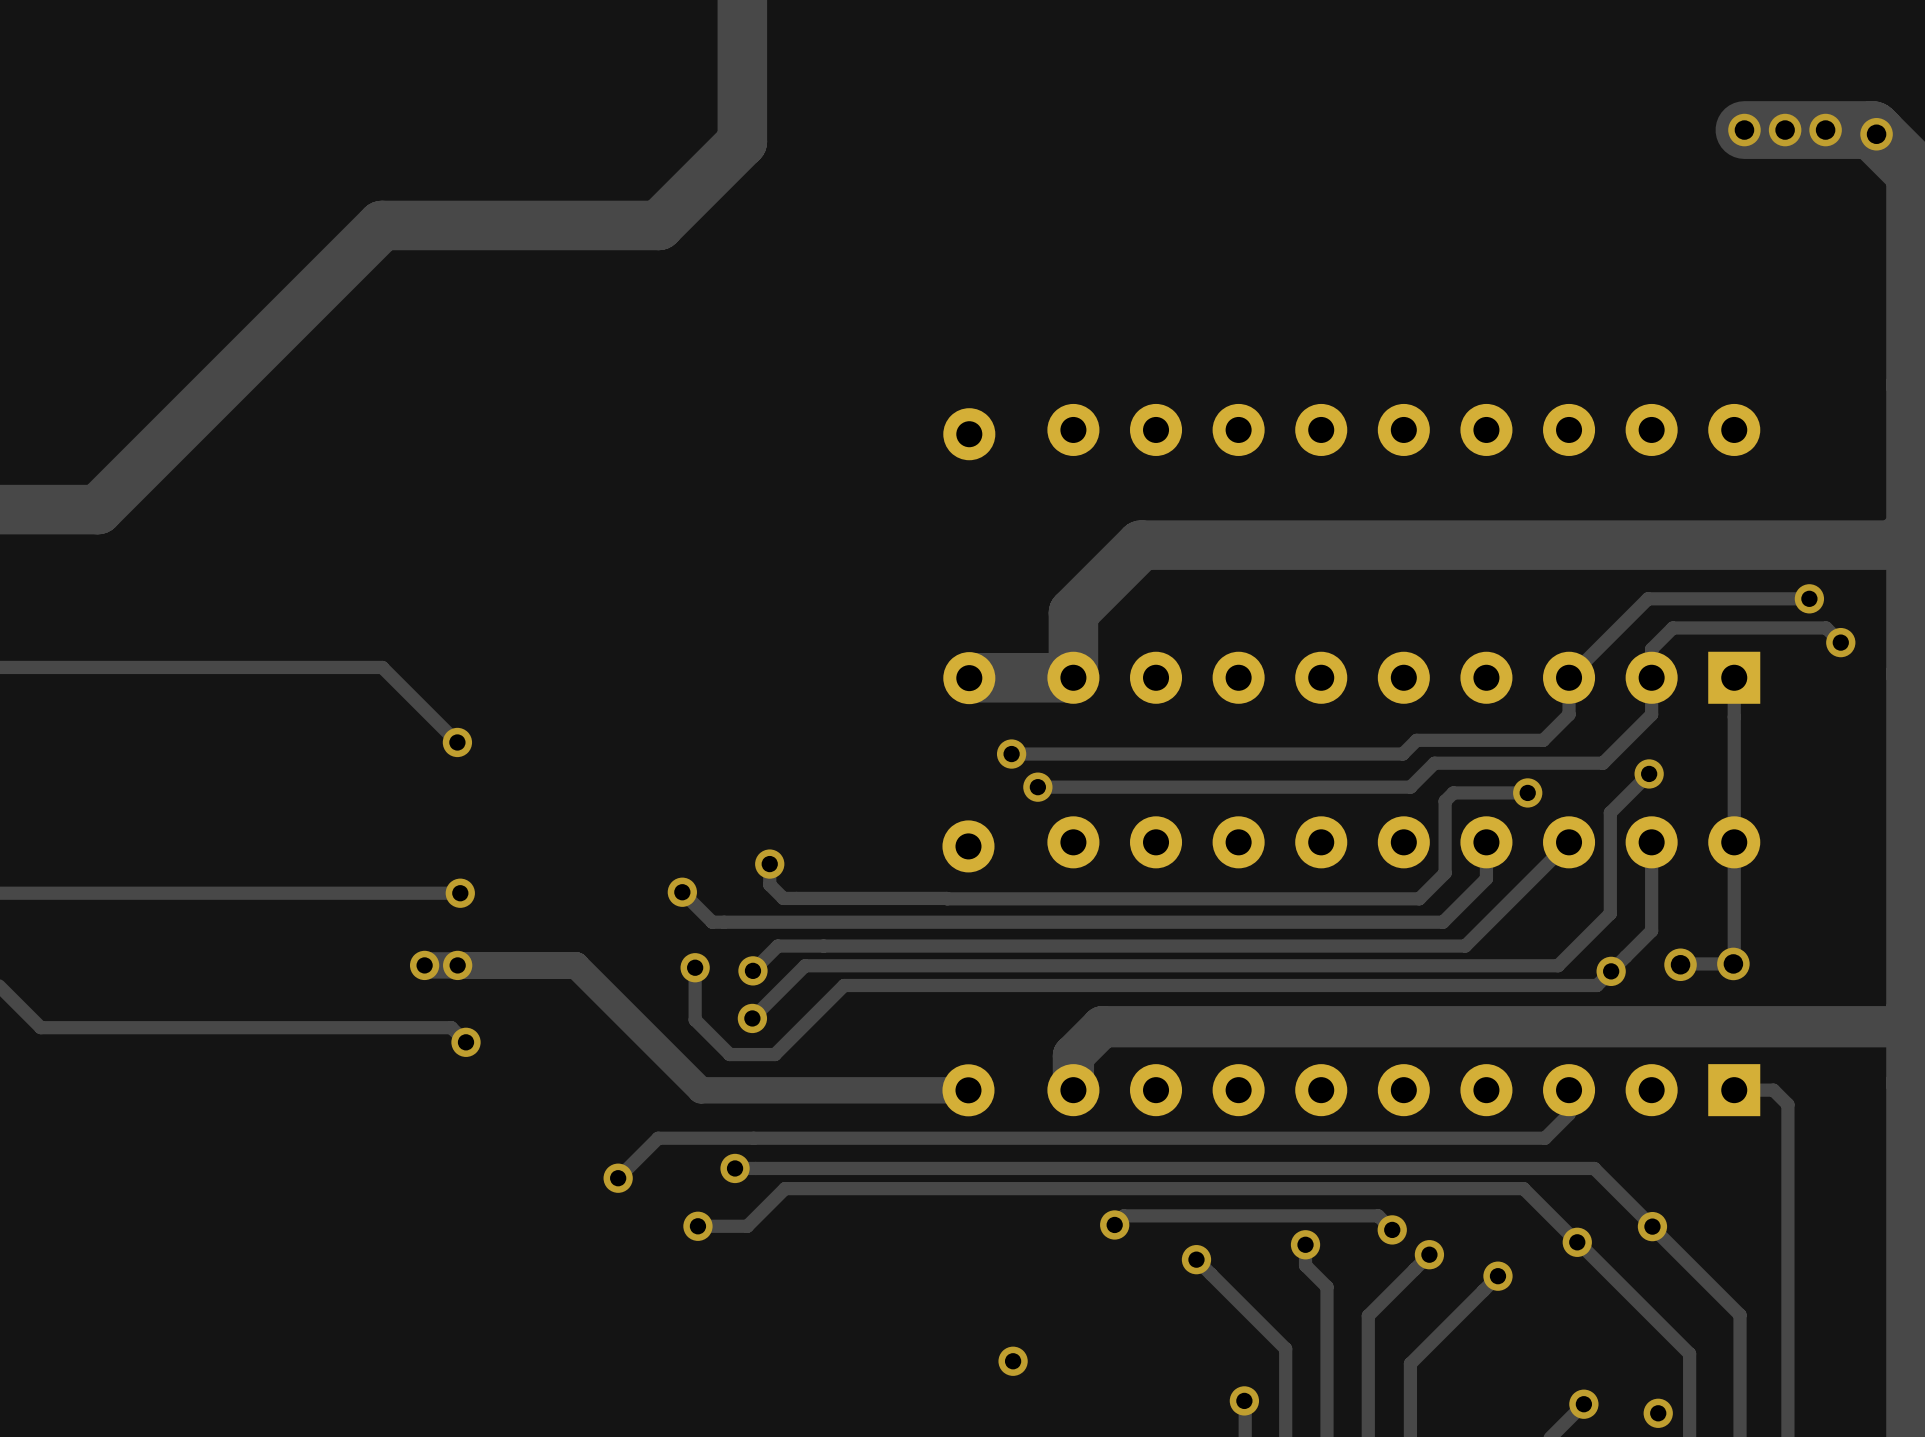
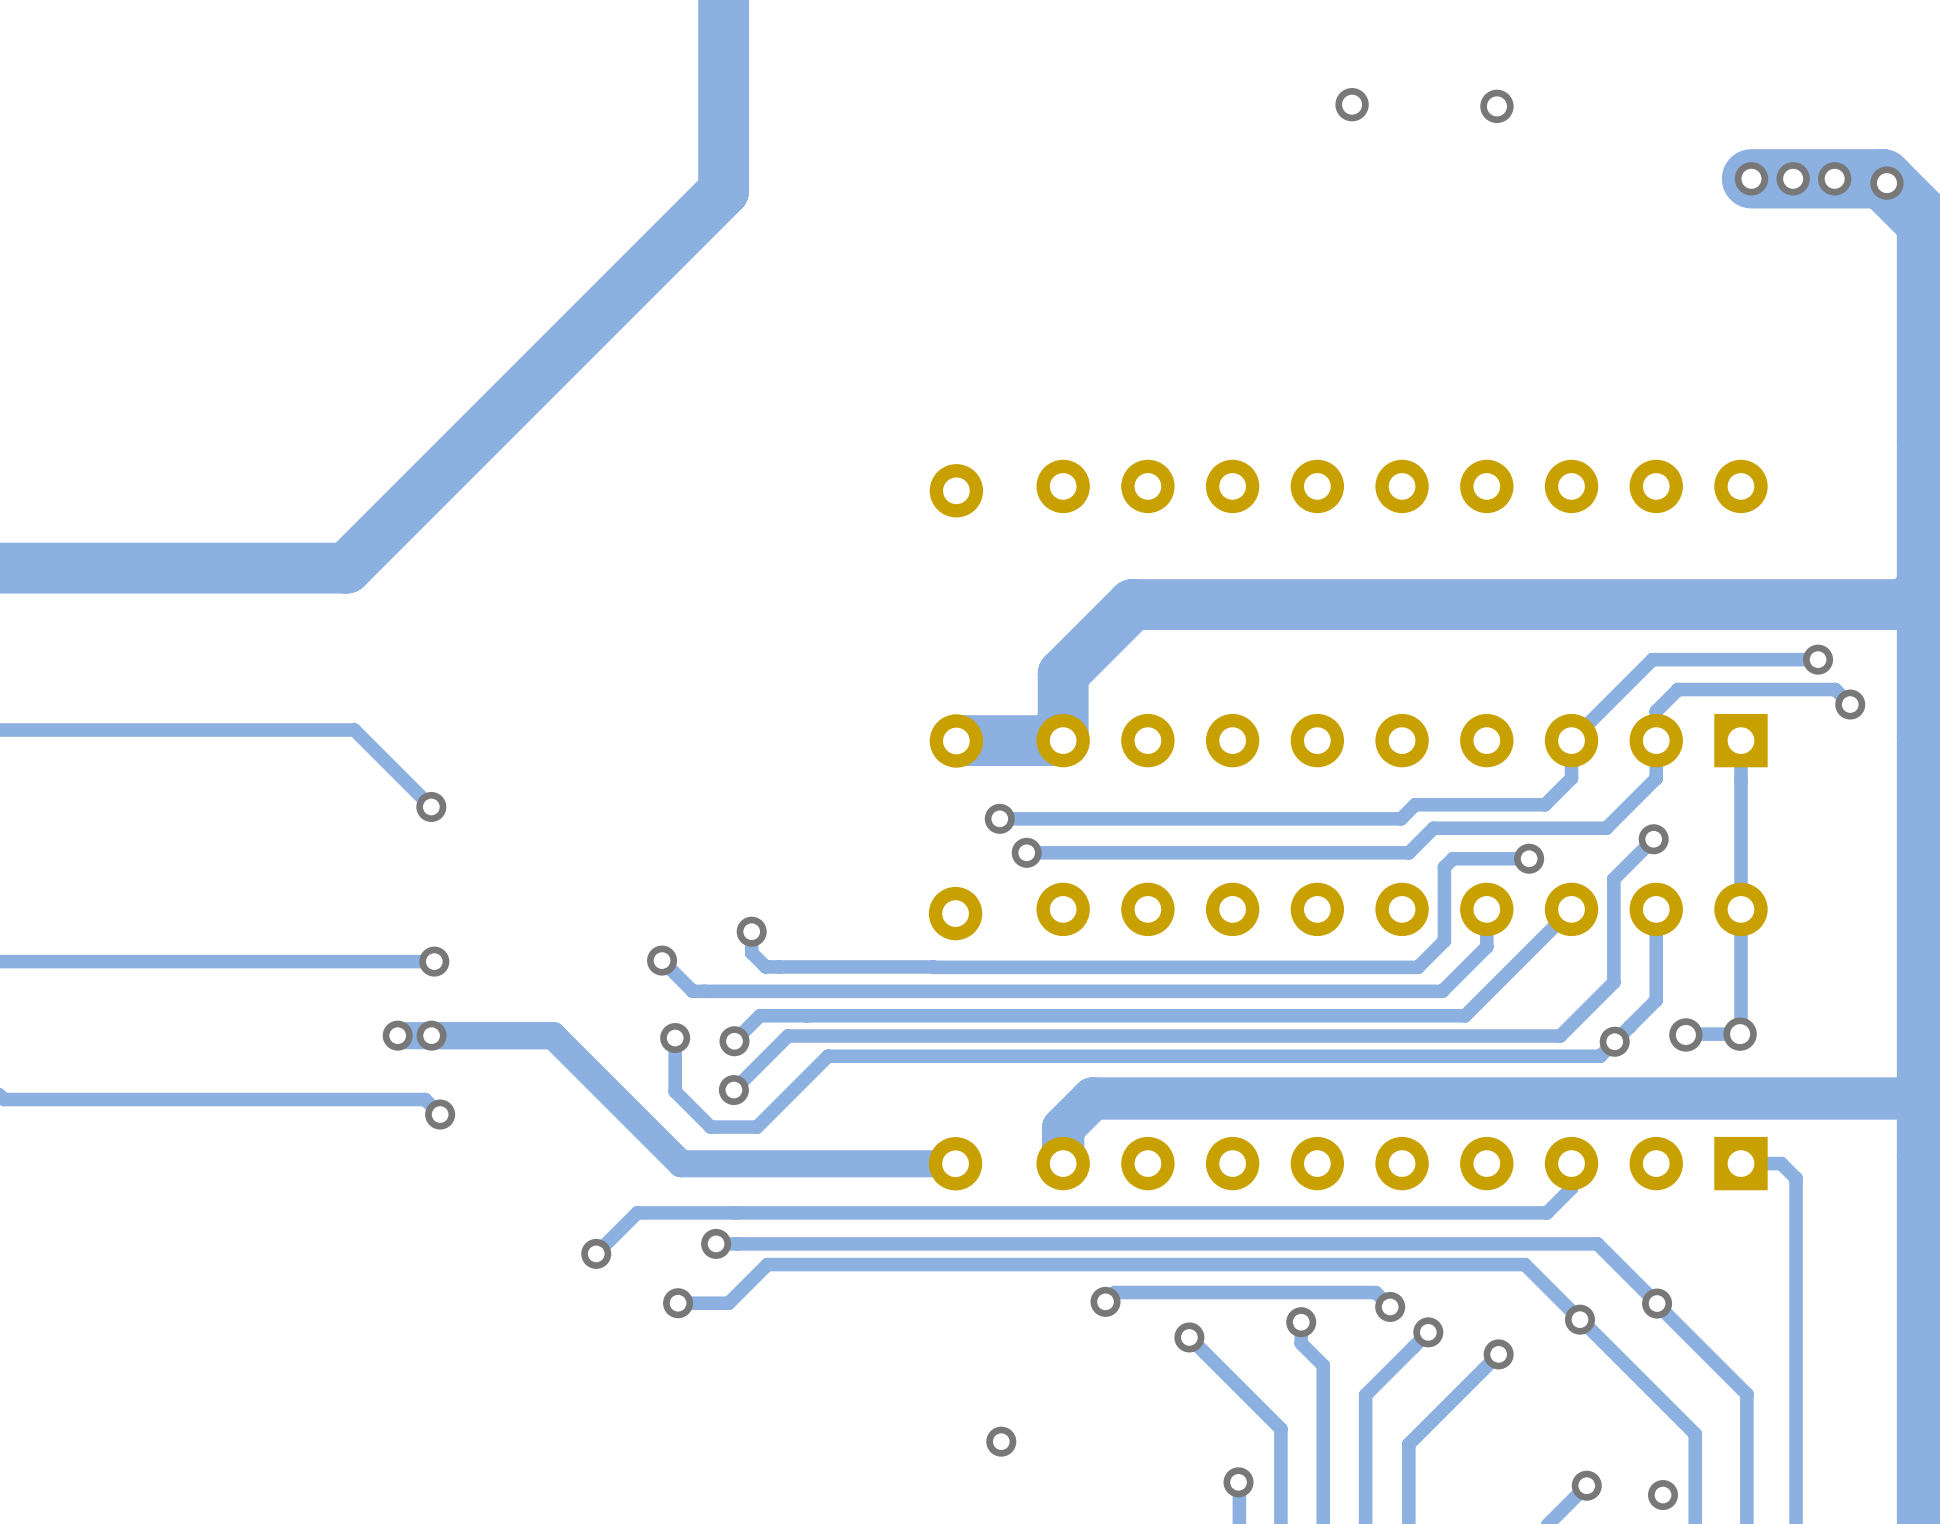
via: none -> (1352, 104)
via: none -> (1496, 106)
track: (658, 225) (382, 225) (97, 509) -> (637, 276) (346, 568) (62, 568)

